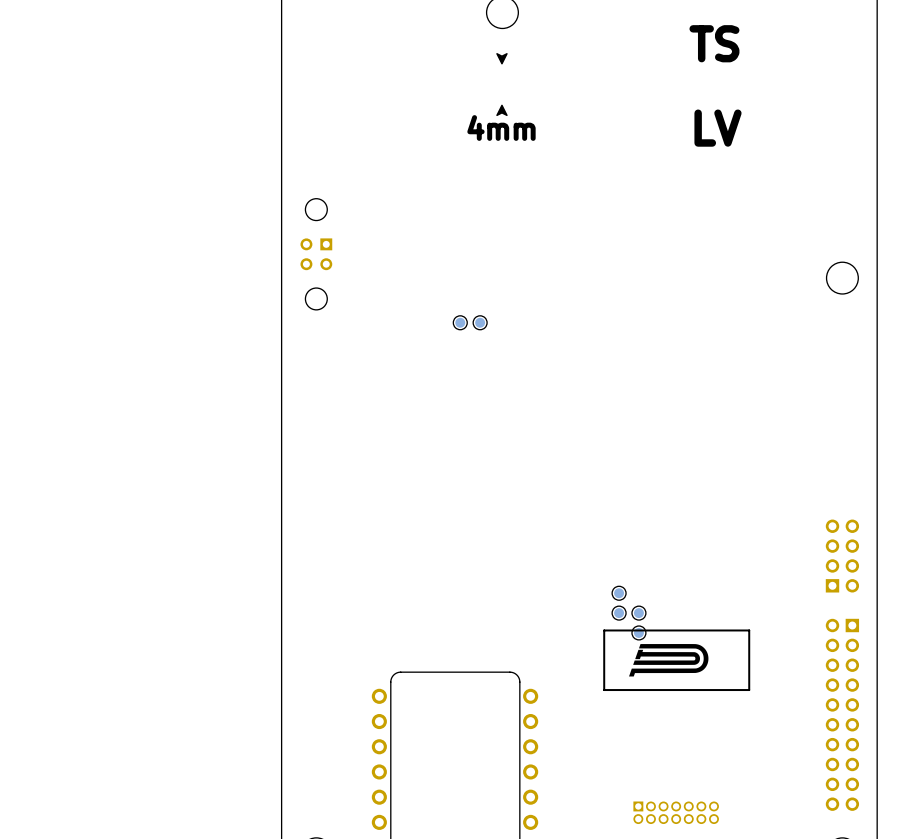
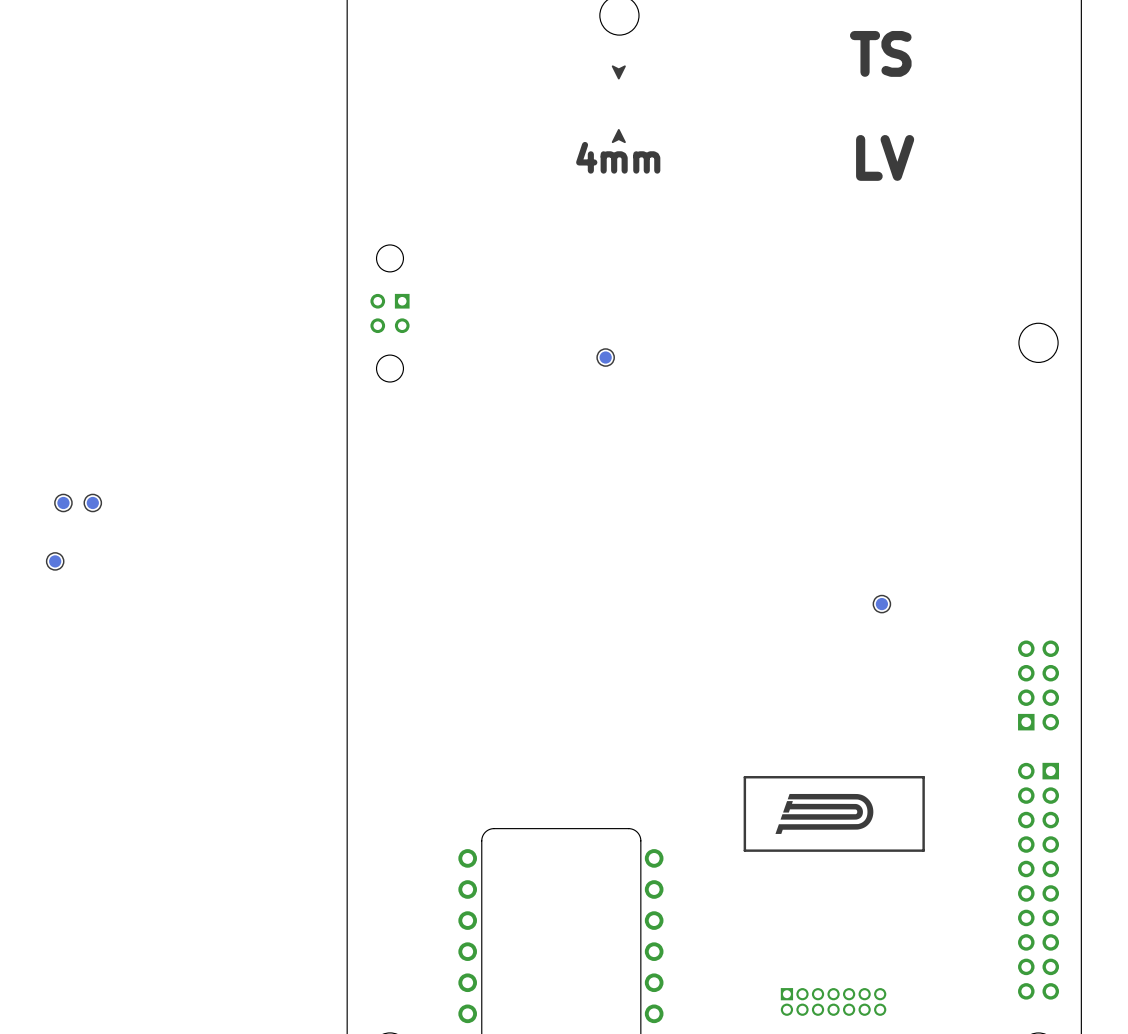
part: none -> (605, 357)
part: (460, 322) -> none
part: (480, 322) -> none
part: none -> (63, 502)
part: none -> (92, 502)
part: none -> (55, 561)
part: none -> (881, 604)
part: (619, 593) -> none
part: (619, 613) -> none
part: (638, 613) -> none
part: (638, 632) -> none

